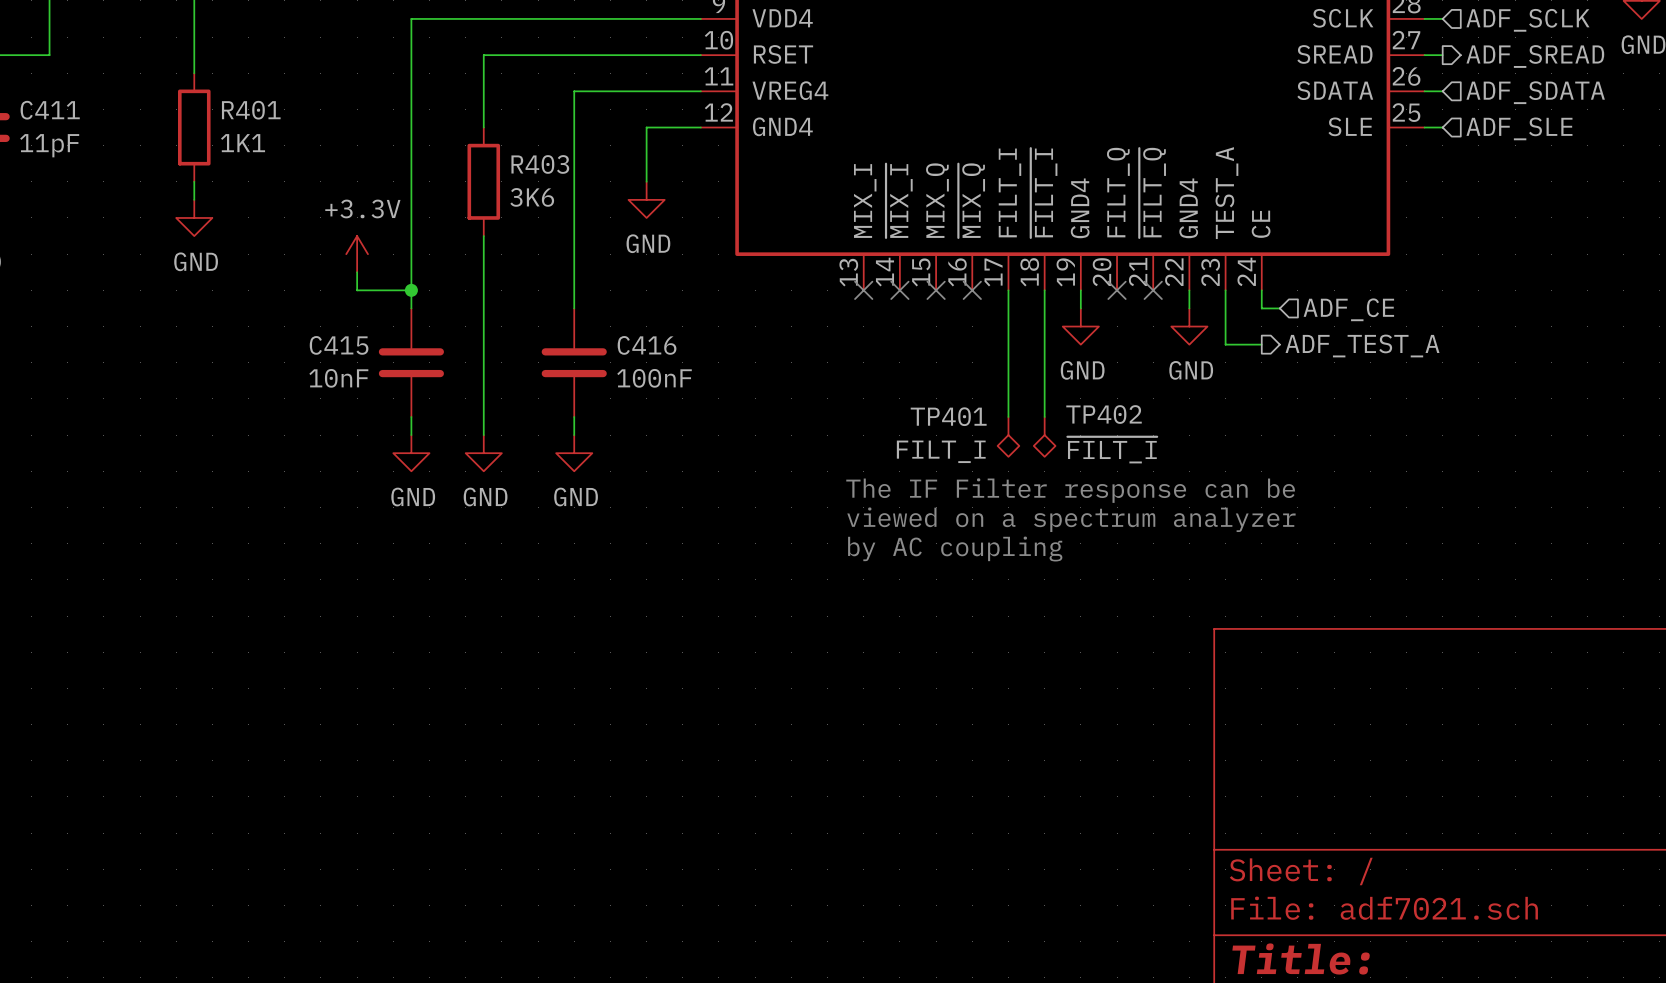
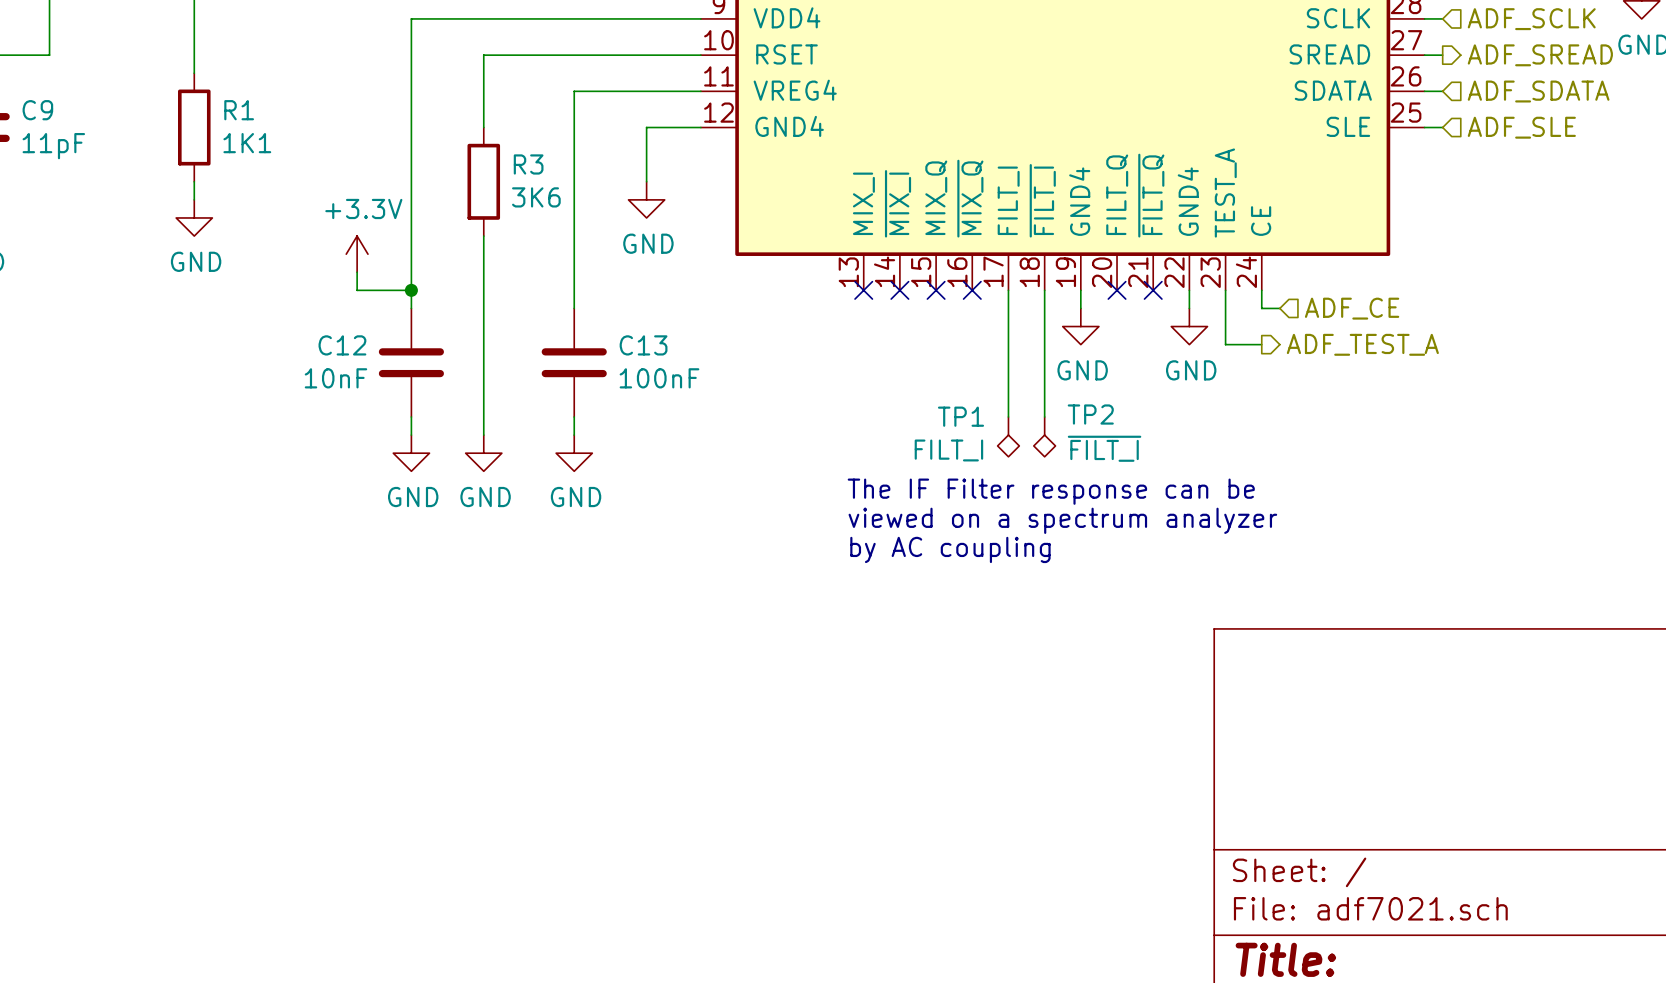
C411 name: C411 (50, 110) -> C9 (37, 110)
R401 name: R401 (251, 110) -> R1 (239, 110)
R403 name: R403 (540, 164) -> R3 (528, 164)
C415 name: C415 (339, 345) -> C12 (342, 345)
C416 name: C416 (647, 345) -> C13 (643, 345)
TP402 name: TP402 (1104, 414) -> TP2 (1090, 414)
TP401 name: TP401 (948, 416) -> TP1 (960, 416)

